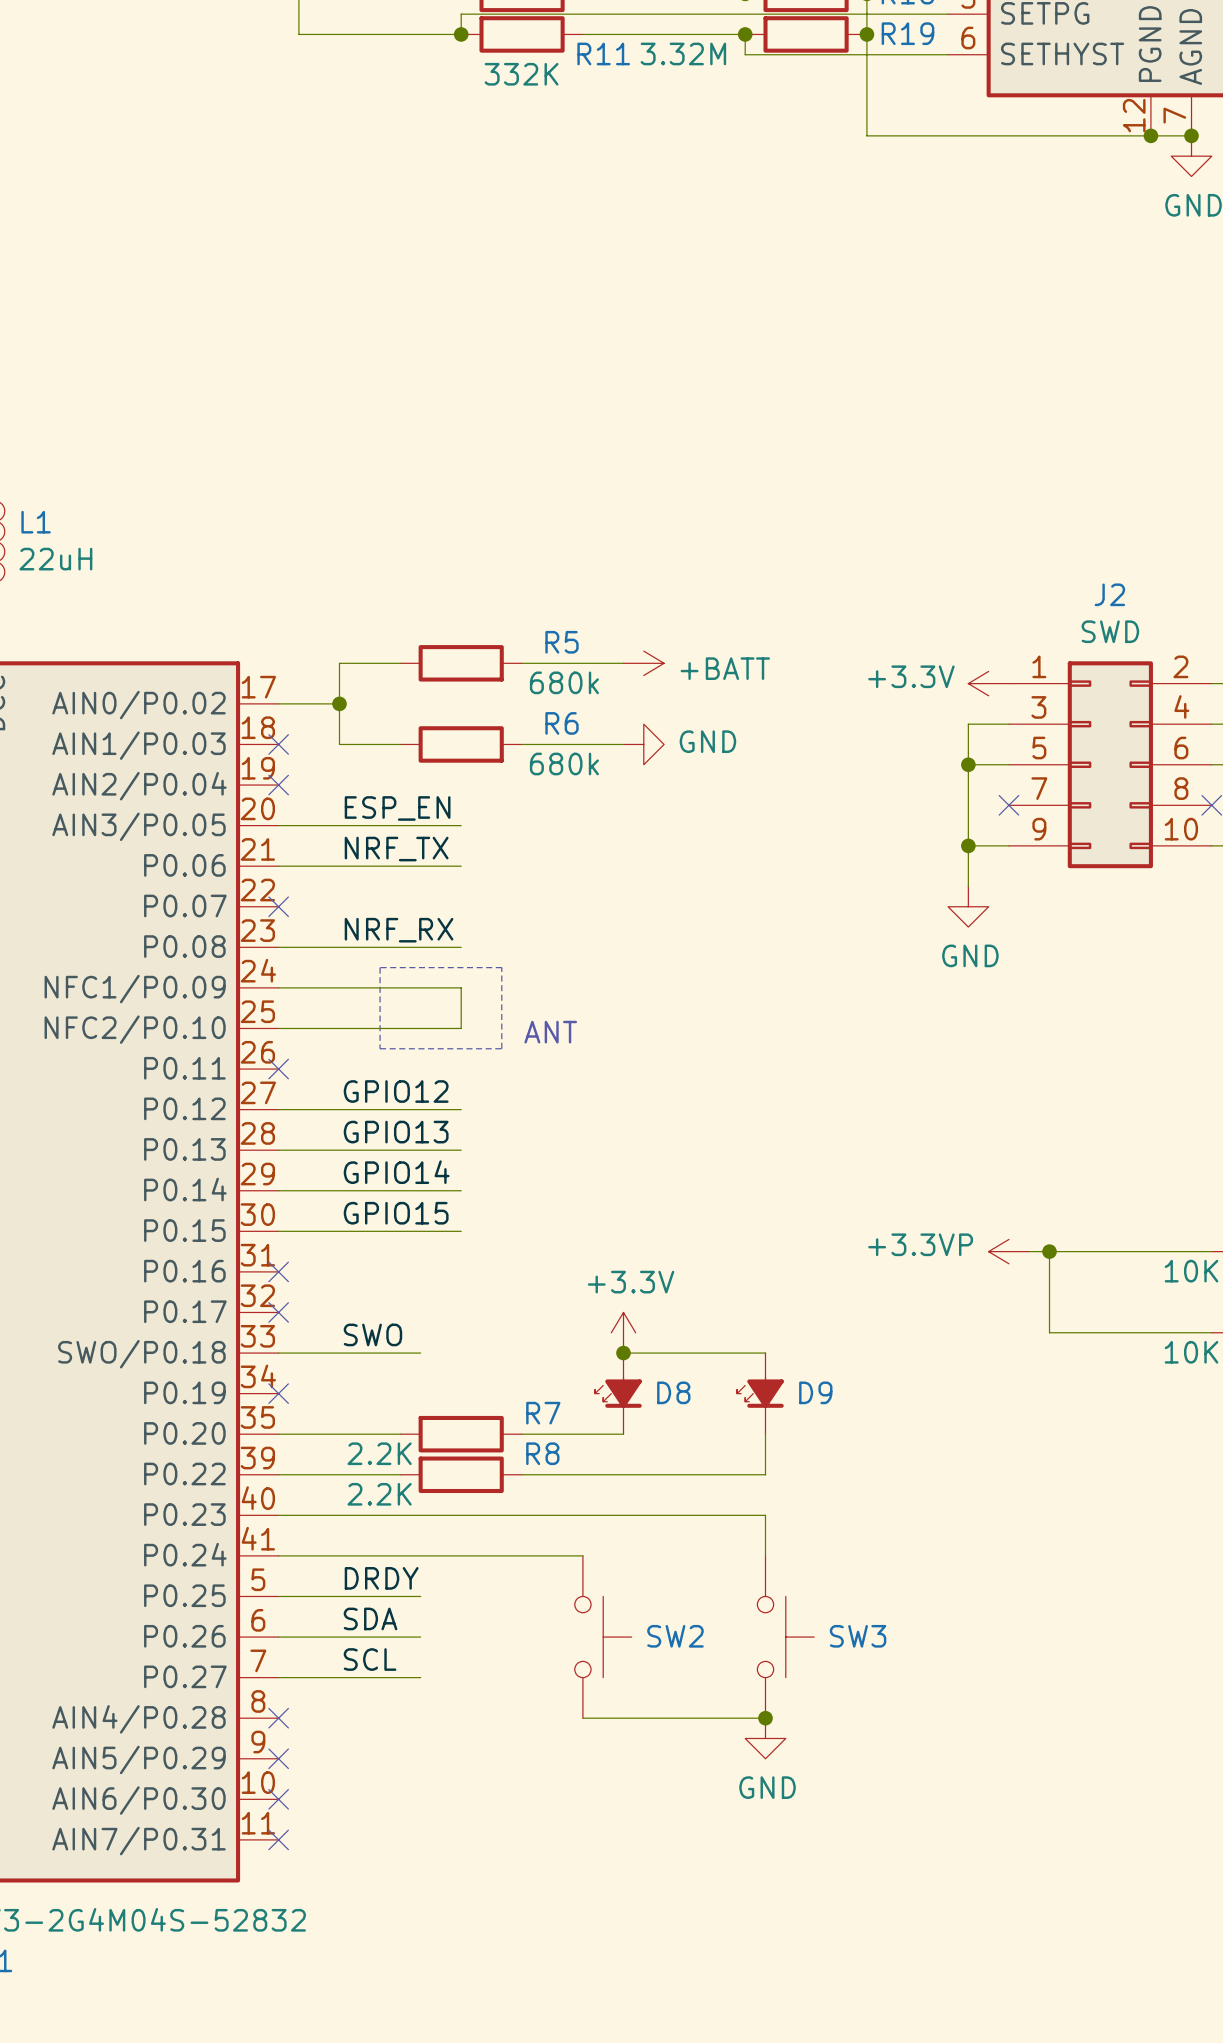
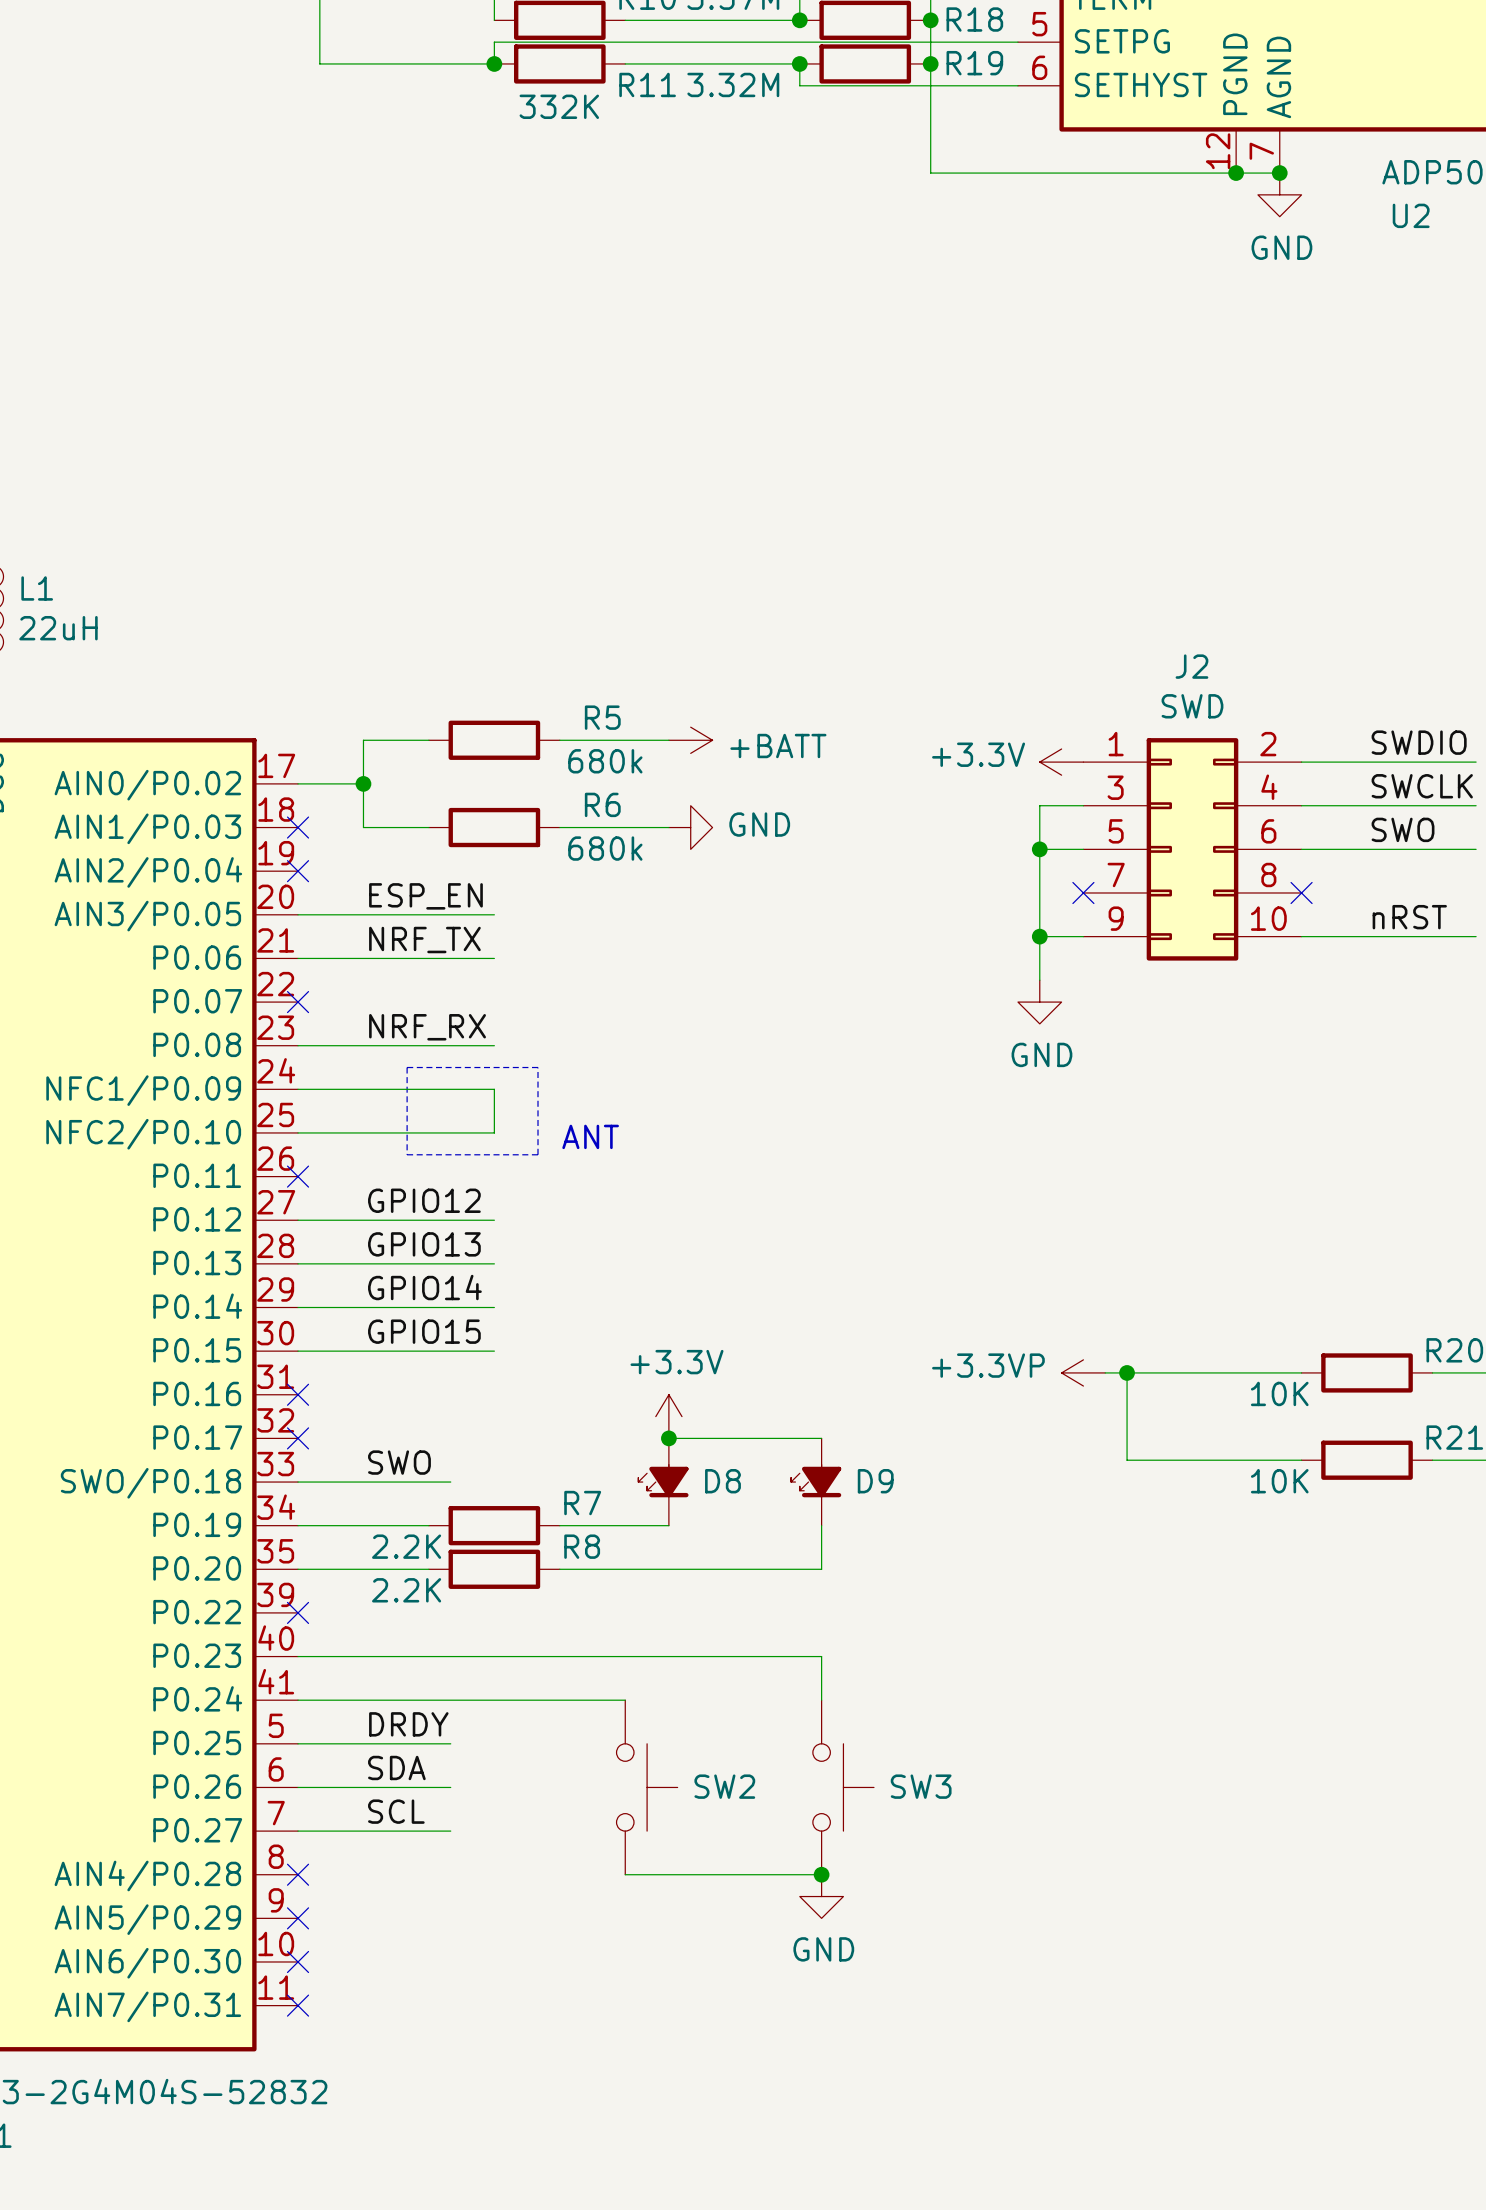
power symbol position: +3.3V (623, 1332) -> +3.3V (668, 1416)
wire: (623, 1353) (765, 1353) -> (668, 1438) (821, 1438)
junction position: (623, 1353) -> (668, 1438)
no-connect mark position: (278, 1393) -> (298, 1612)
R7: none -> 2.2K (494, 1525)
wire: none -> (559, 1525) (668, 1525)
D8 position: (618, 1393) -> (663, 1482)
D9 position: (760, 1393) -> (816, 1482)
wire: none -> (821, 1525) (821, 1569) (668, 1569)
R7 name: R7 (543, 1413) -> R8 (582, 1546)
wire: (765, 1434) (765, 1474) (522, 1474) -> none
wire: (278, 1474) (400, 1474) -> (298, 1525) (428, 1525)
R8: 2.2K (461, 1474) -> none

